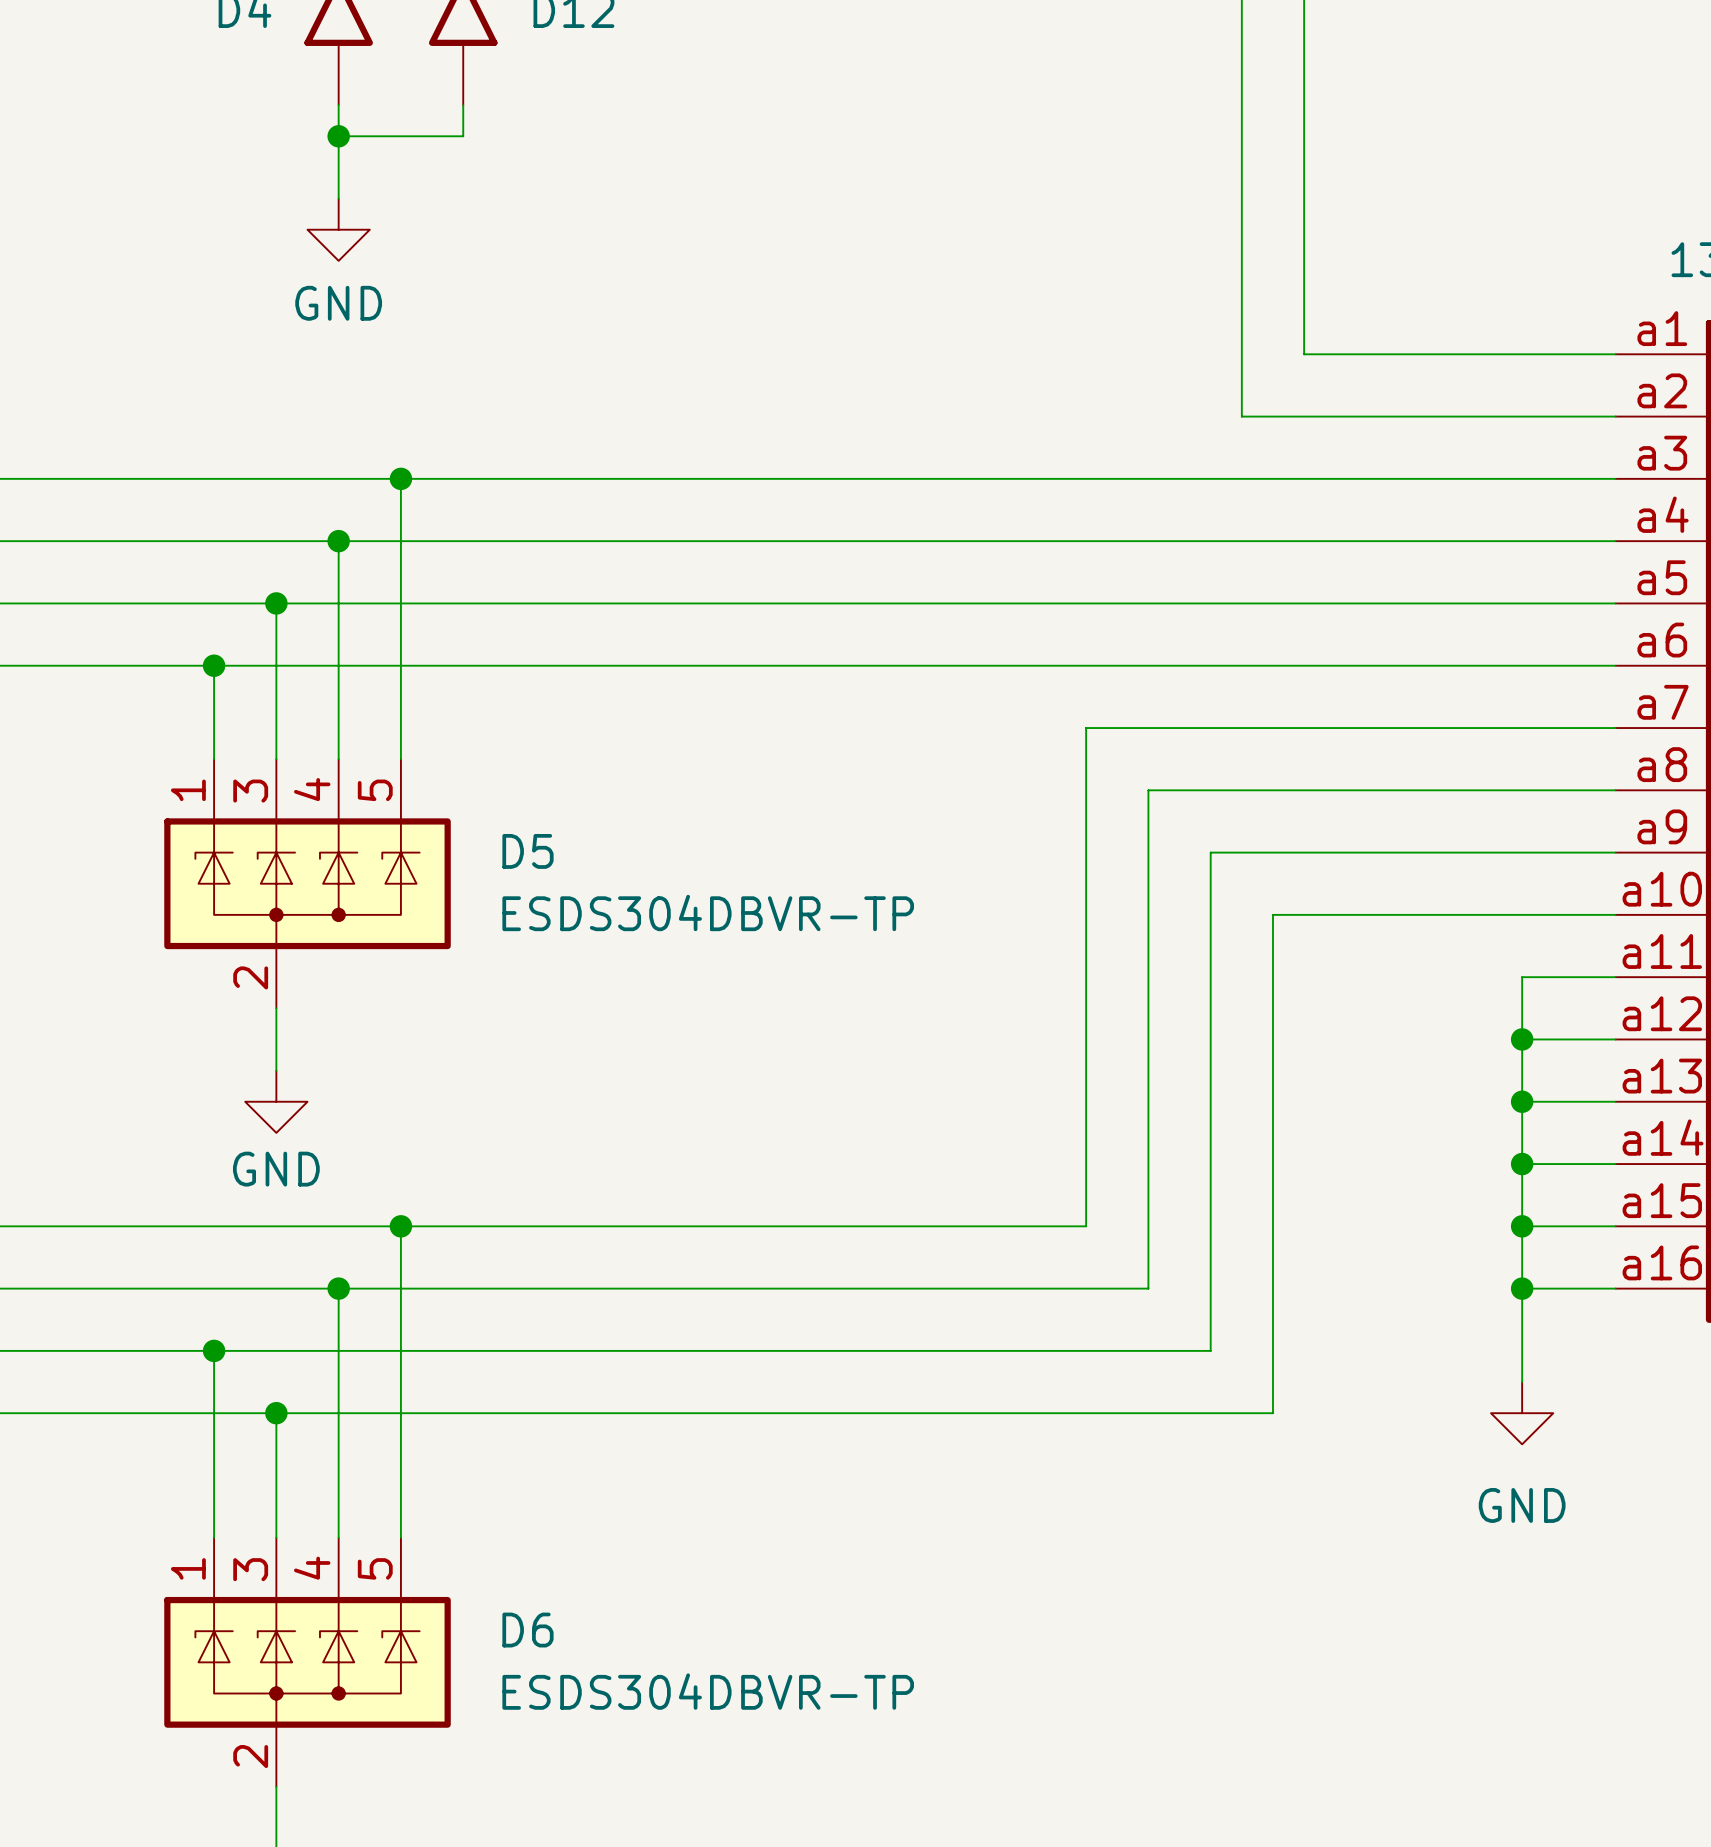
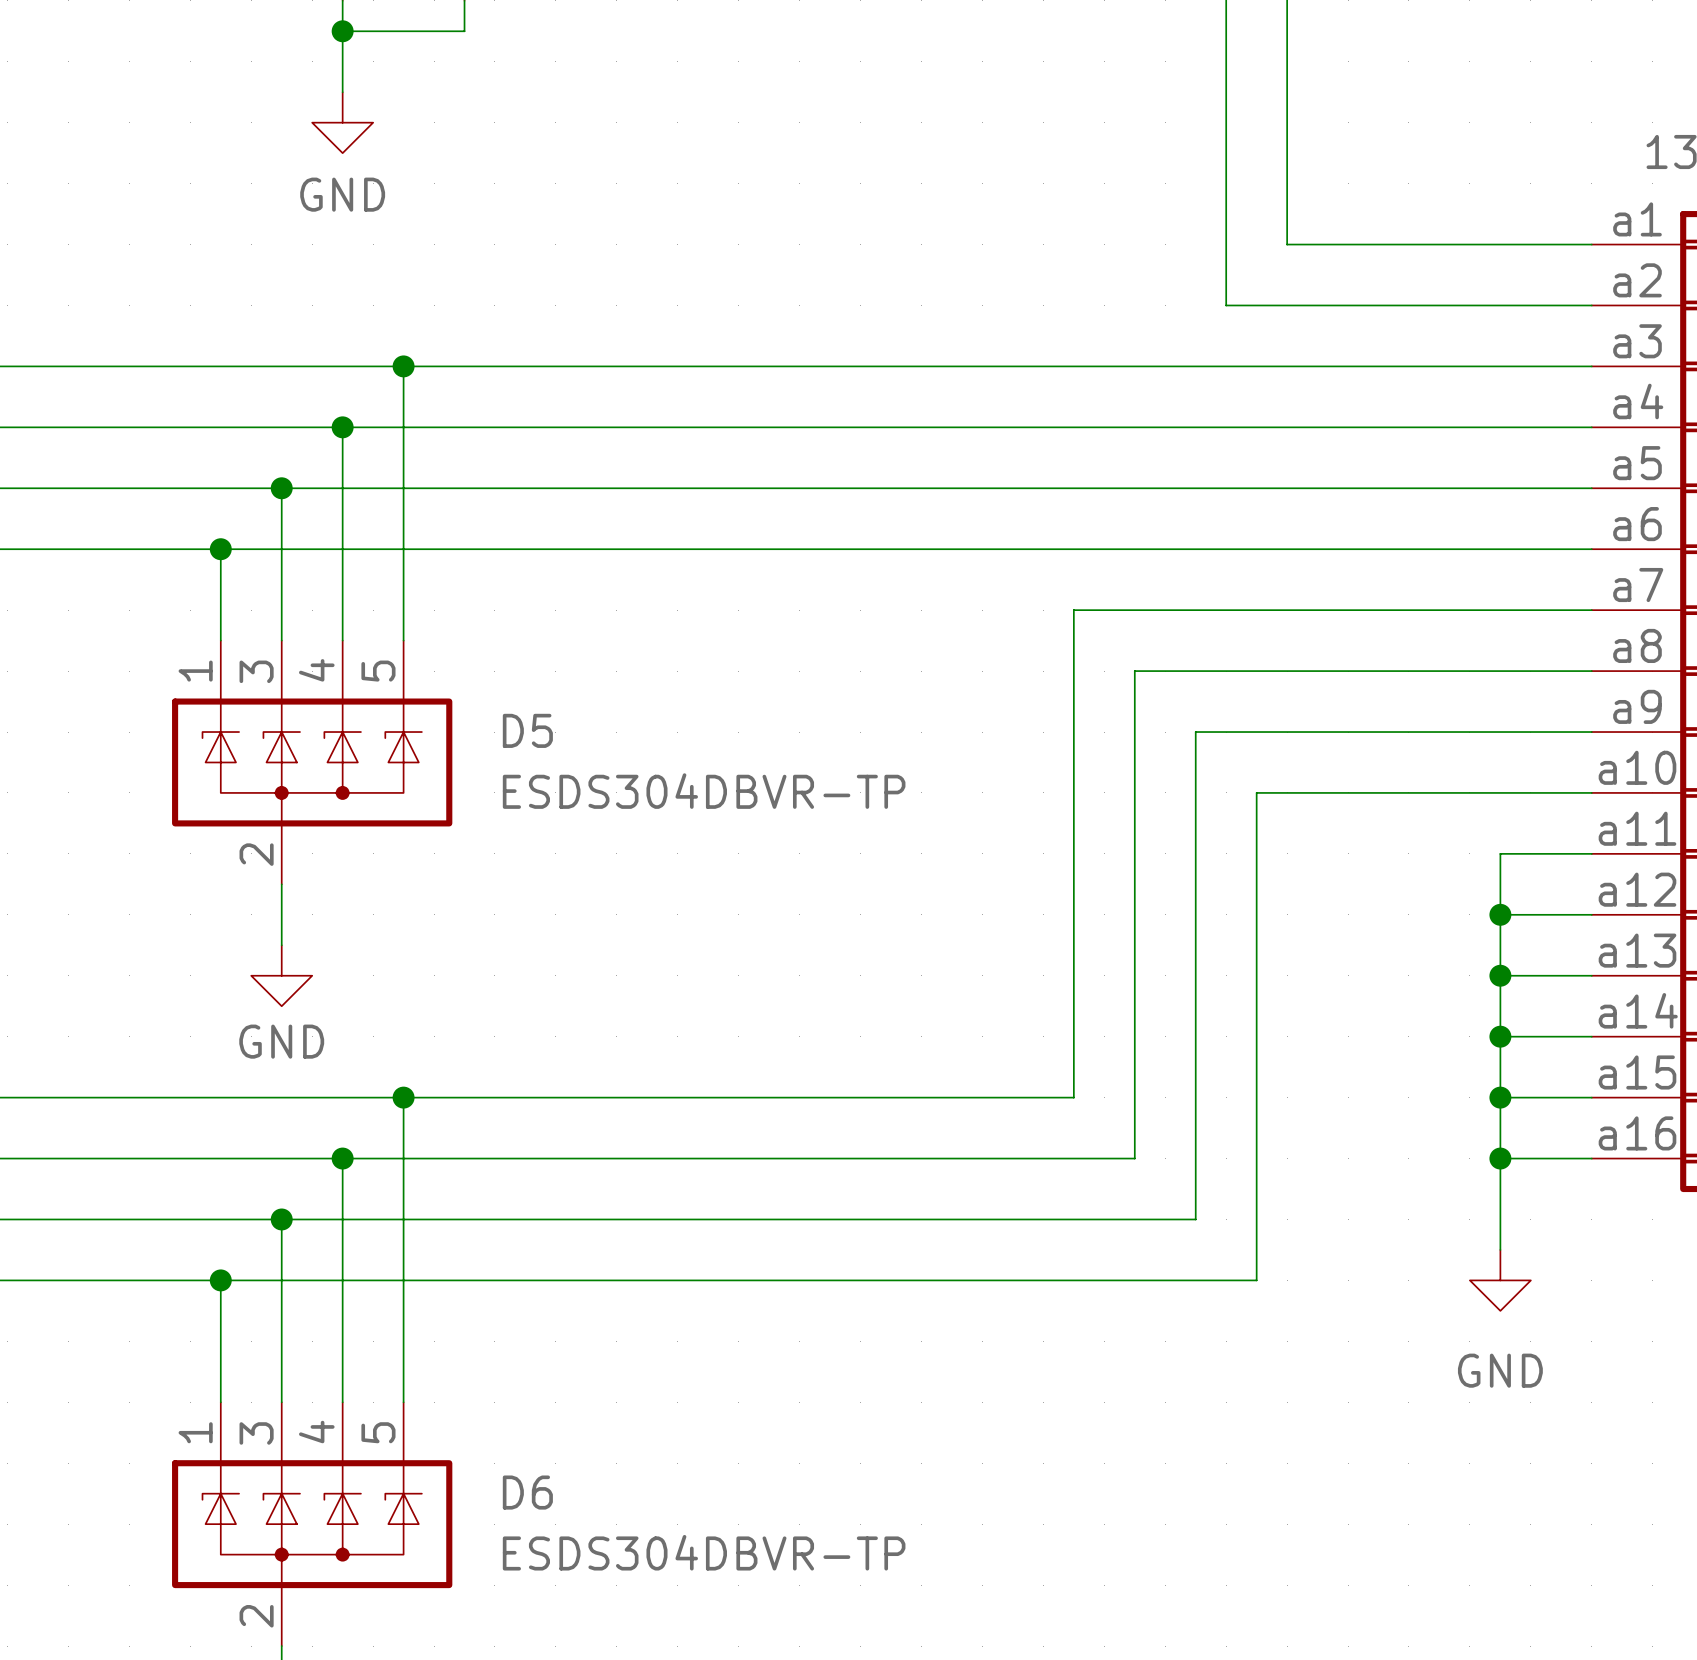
wire: (214, 1350) (214, 1413) -> (281, 1219) (281, 1280)
junction: (214, 1350) -> none
junction: none -> (281, 1219)
junction: none -> (220, 1280)
junction: (276, 1413) -> none

